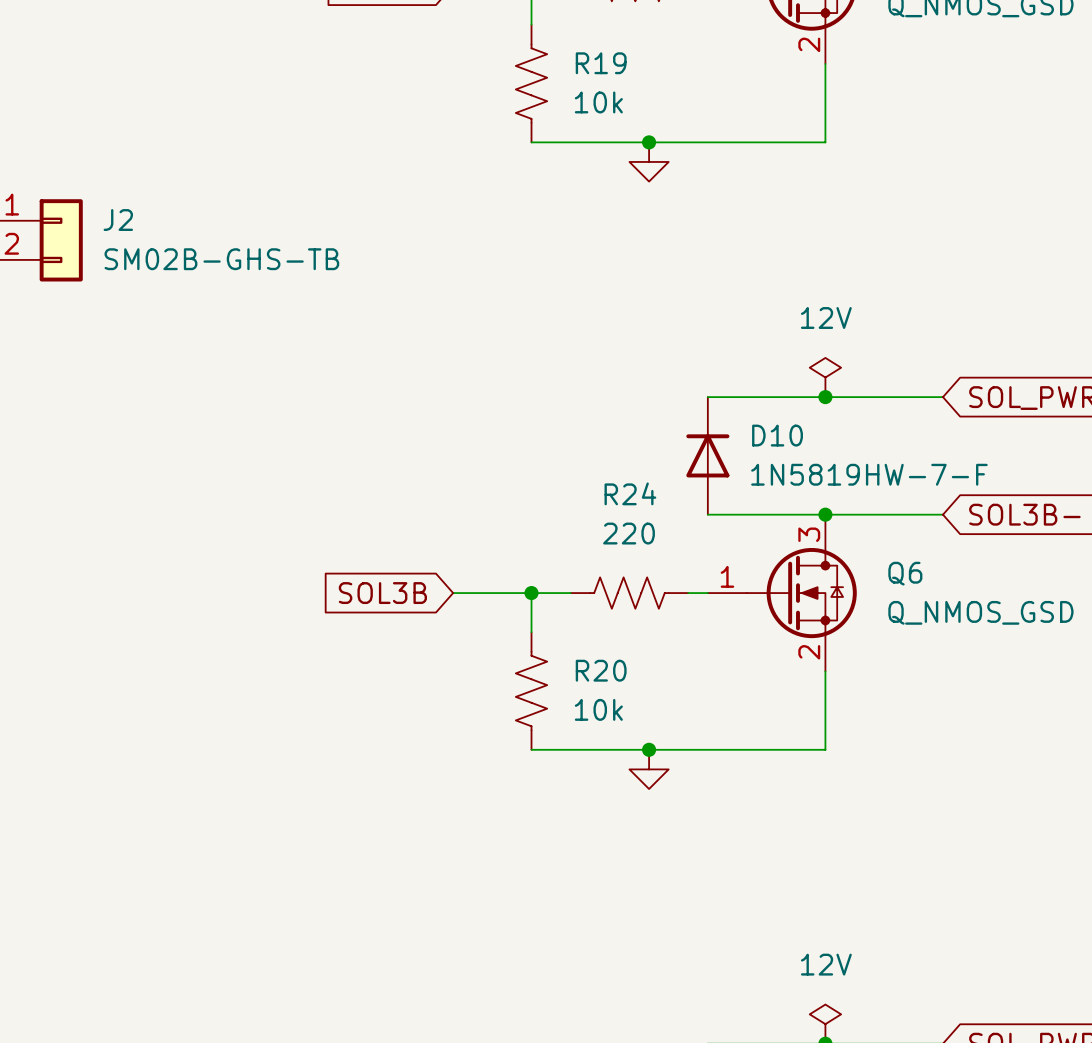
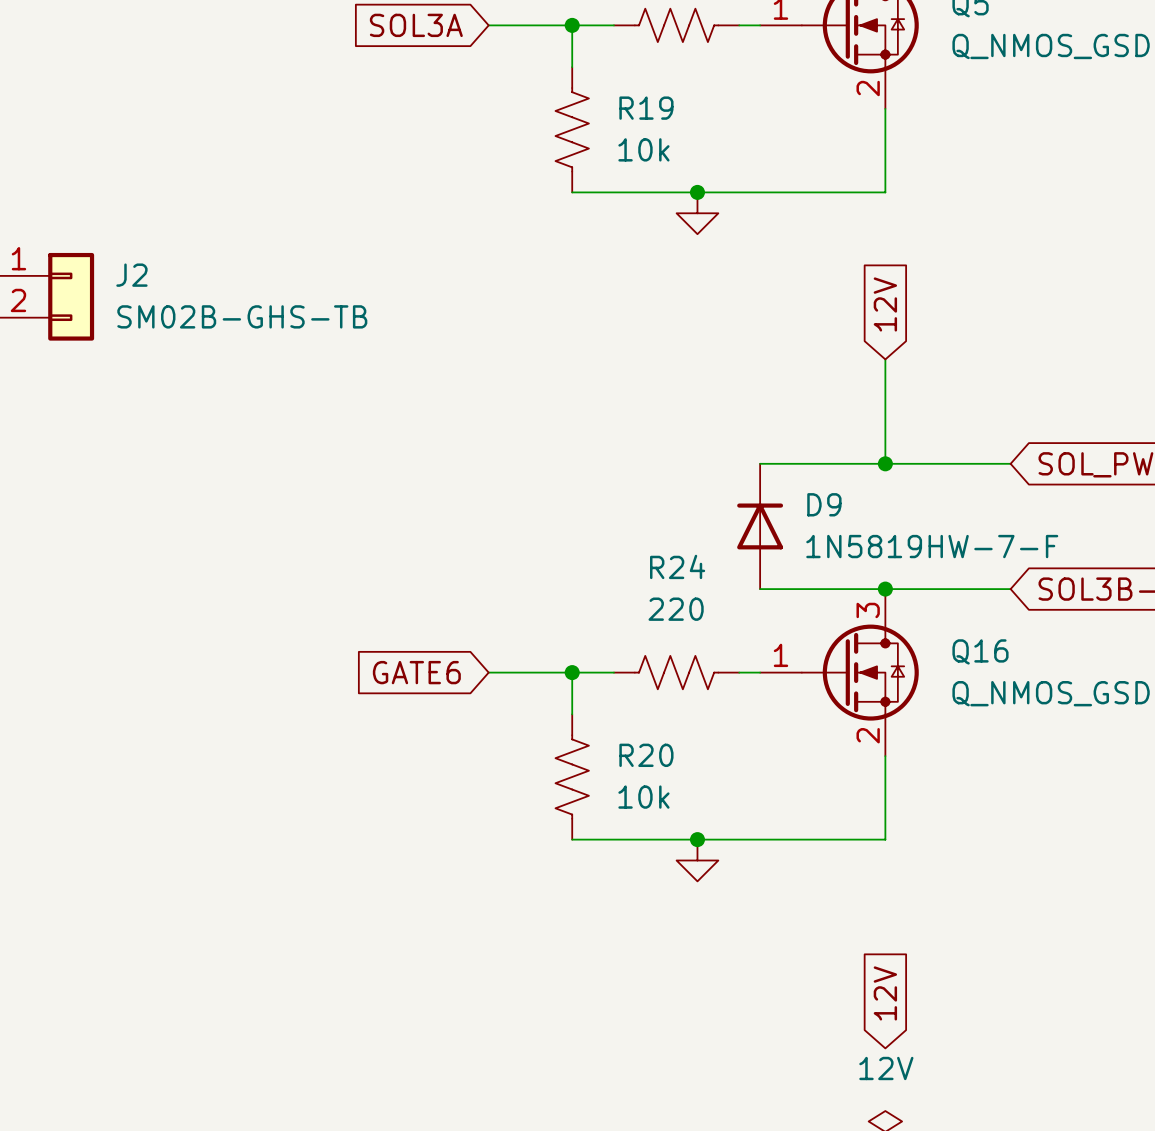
global label: none -> 12V (885, 304)
wire: none -> (885, 359) (885, 463)
power symbol: 12V (825, 377) -> none
D10 name: D10 (777, 435) -> D9 (824, 504)
Q6 name: Q6 (905, 573) -> Q16 (980, 651)
global label: SOL3B (382, 593) -> GATE6 (416, 672)
global label: none -> 12V (885, 993)

